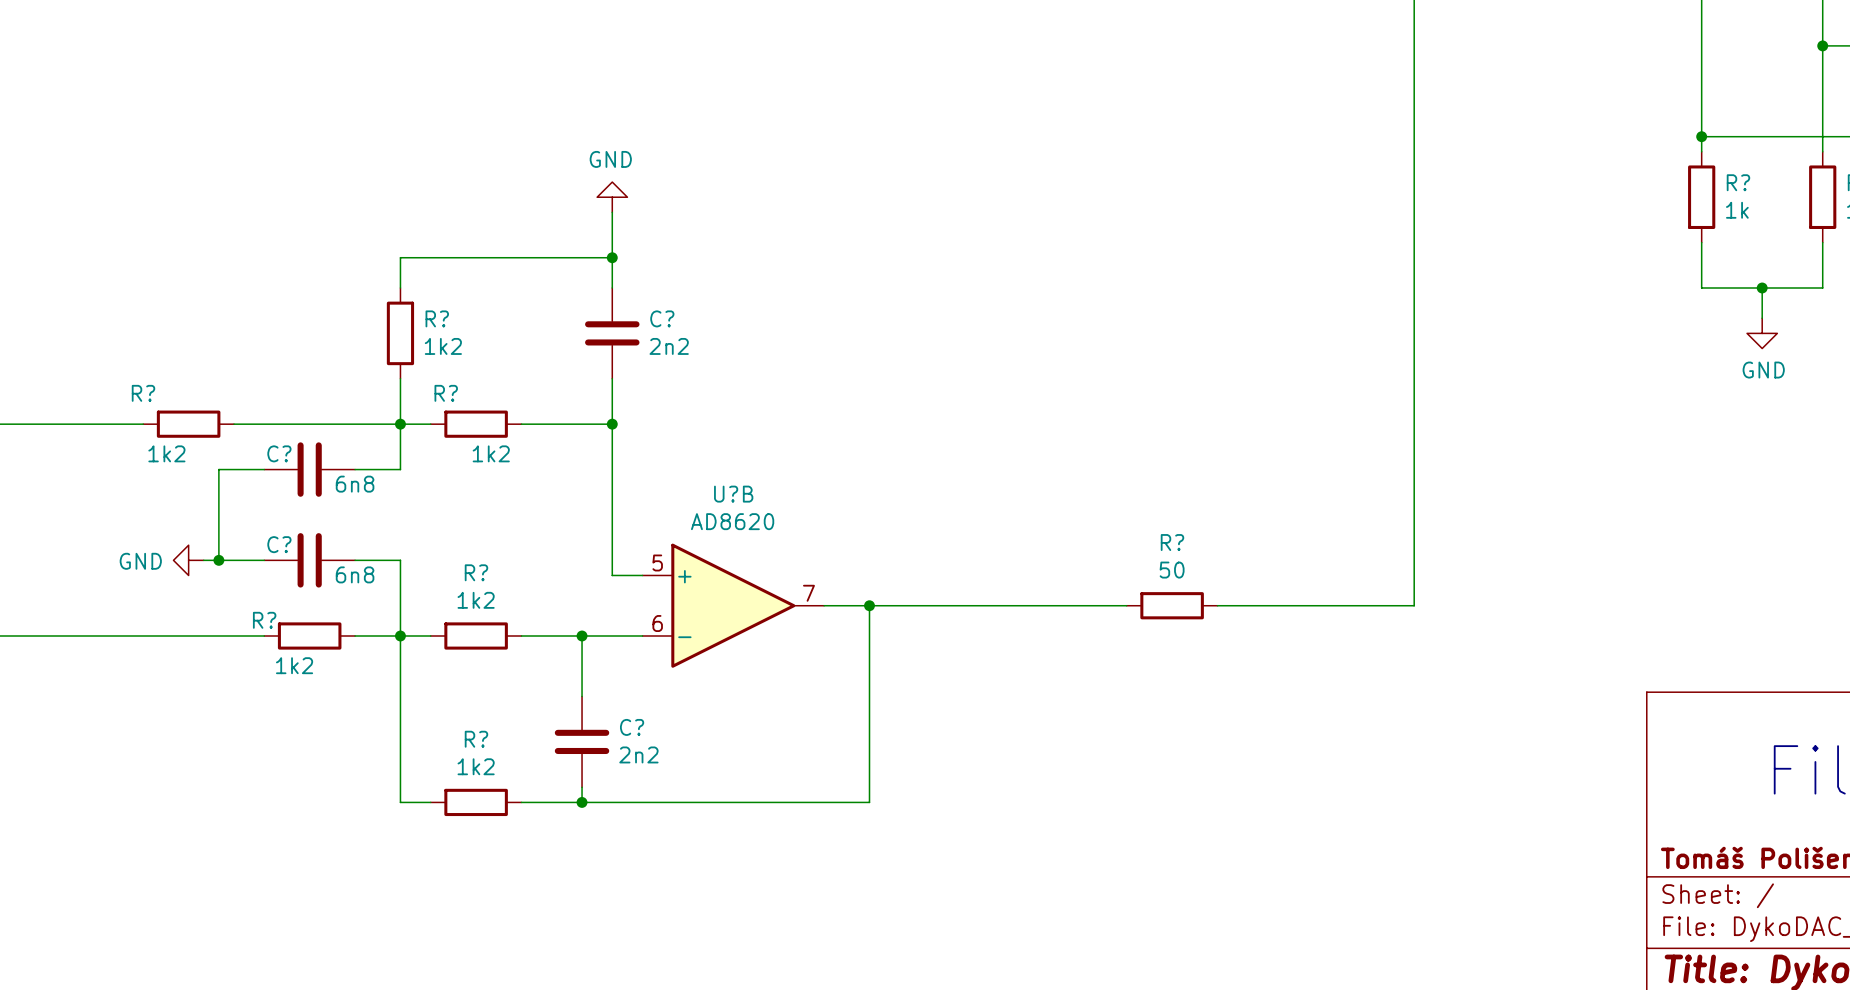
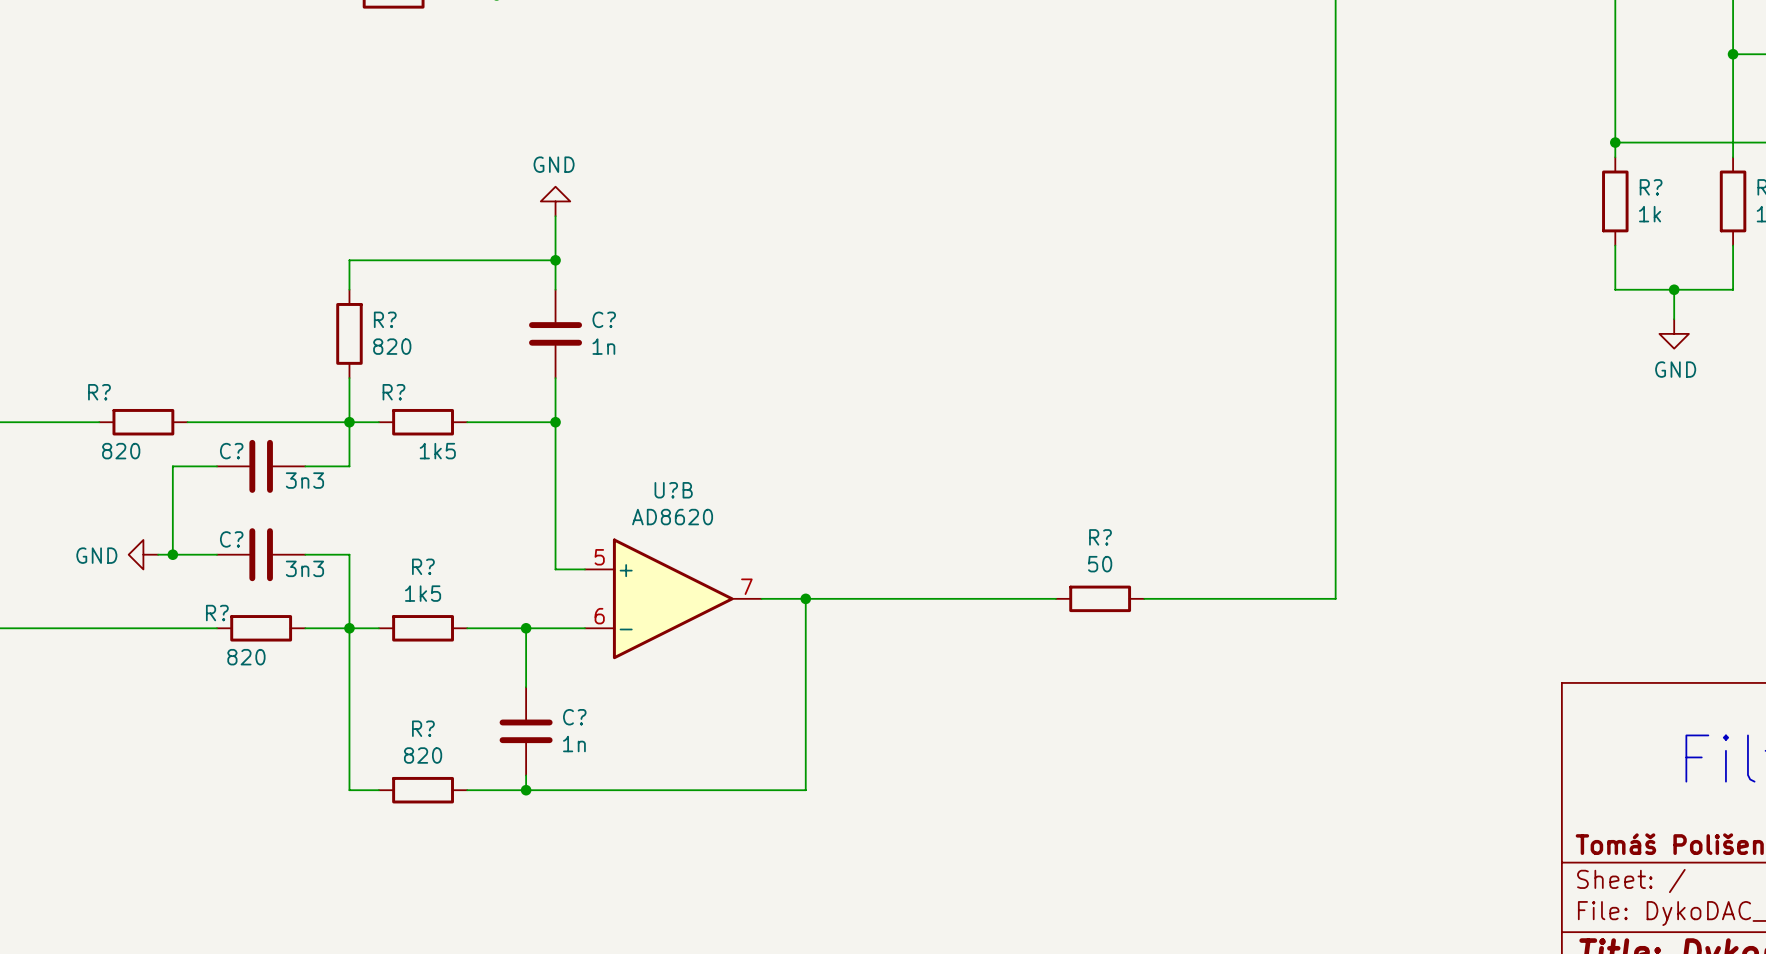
R? value: 1k2 (443, 346) -> 820 (392, 346)
C? value: 2n2 (669, 346) -> 1n (603, 346)
R? value: 1k2 (166, 453) -> 820 (121, 451)
R? value: 1k2 (491, 453) -> 1k5 (437, 451)
C? value: 6n8 (355, 484) -> 3n3 (304, 480)
C? value: 6n8 (355, 574) -> 3n3 (304, 568)
R? value: 1k2 (476, 600) -> 1k5 (423, 593)
R? value: 1k2 (294, 665) -> 820 (246, 657)
C? value: 2n2 (638, 754) -> 1n (574, 744)
R? value: 1k2 (476, 766) -> 820 (423, 755)

